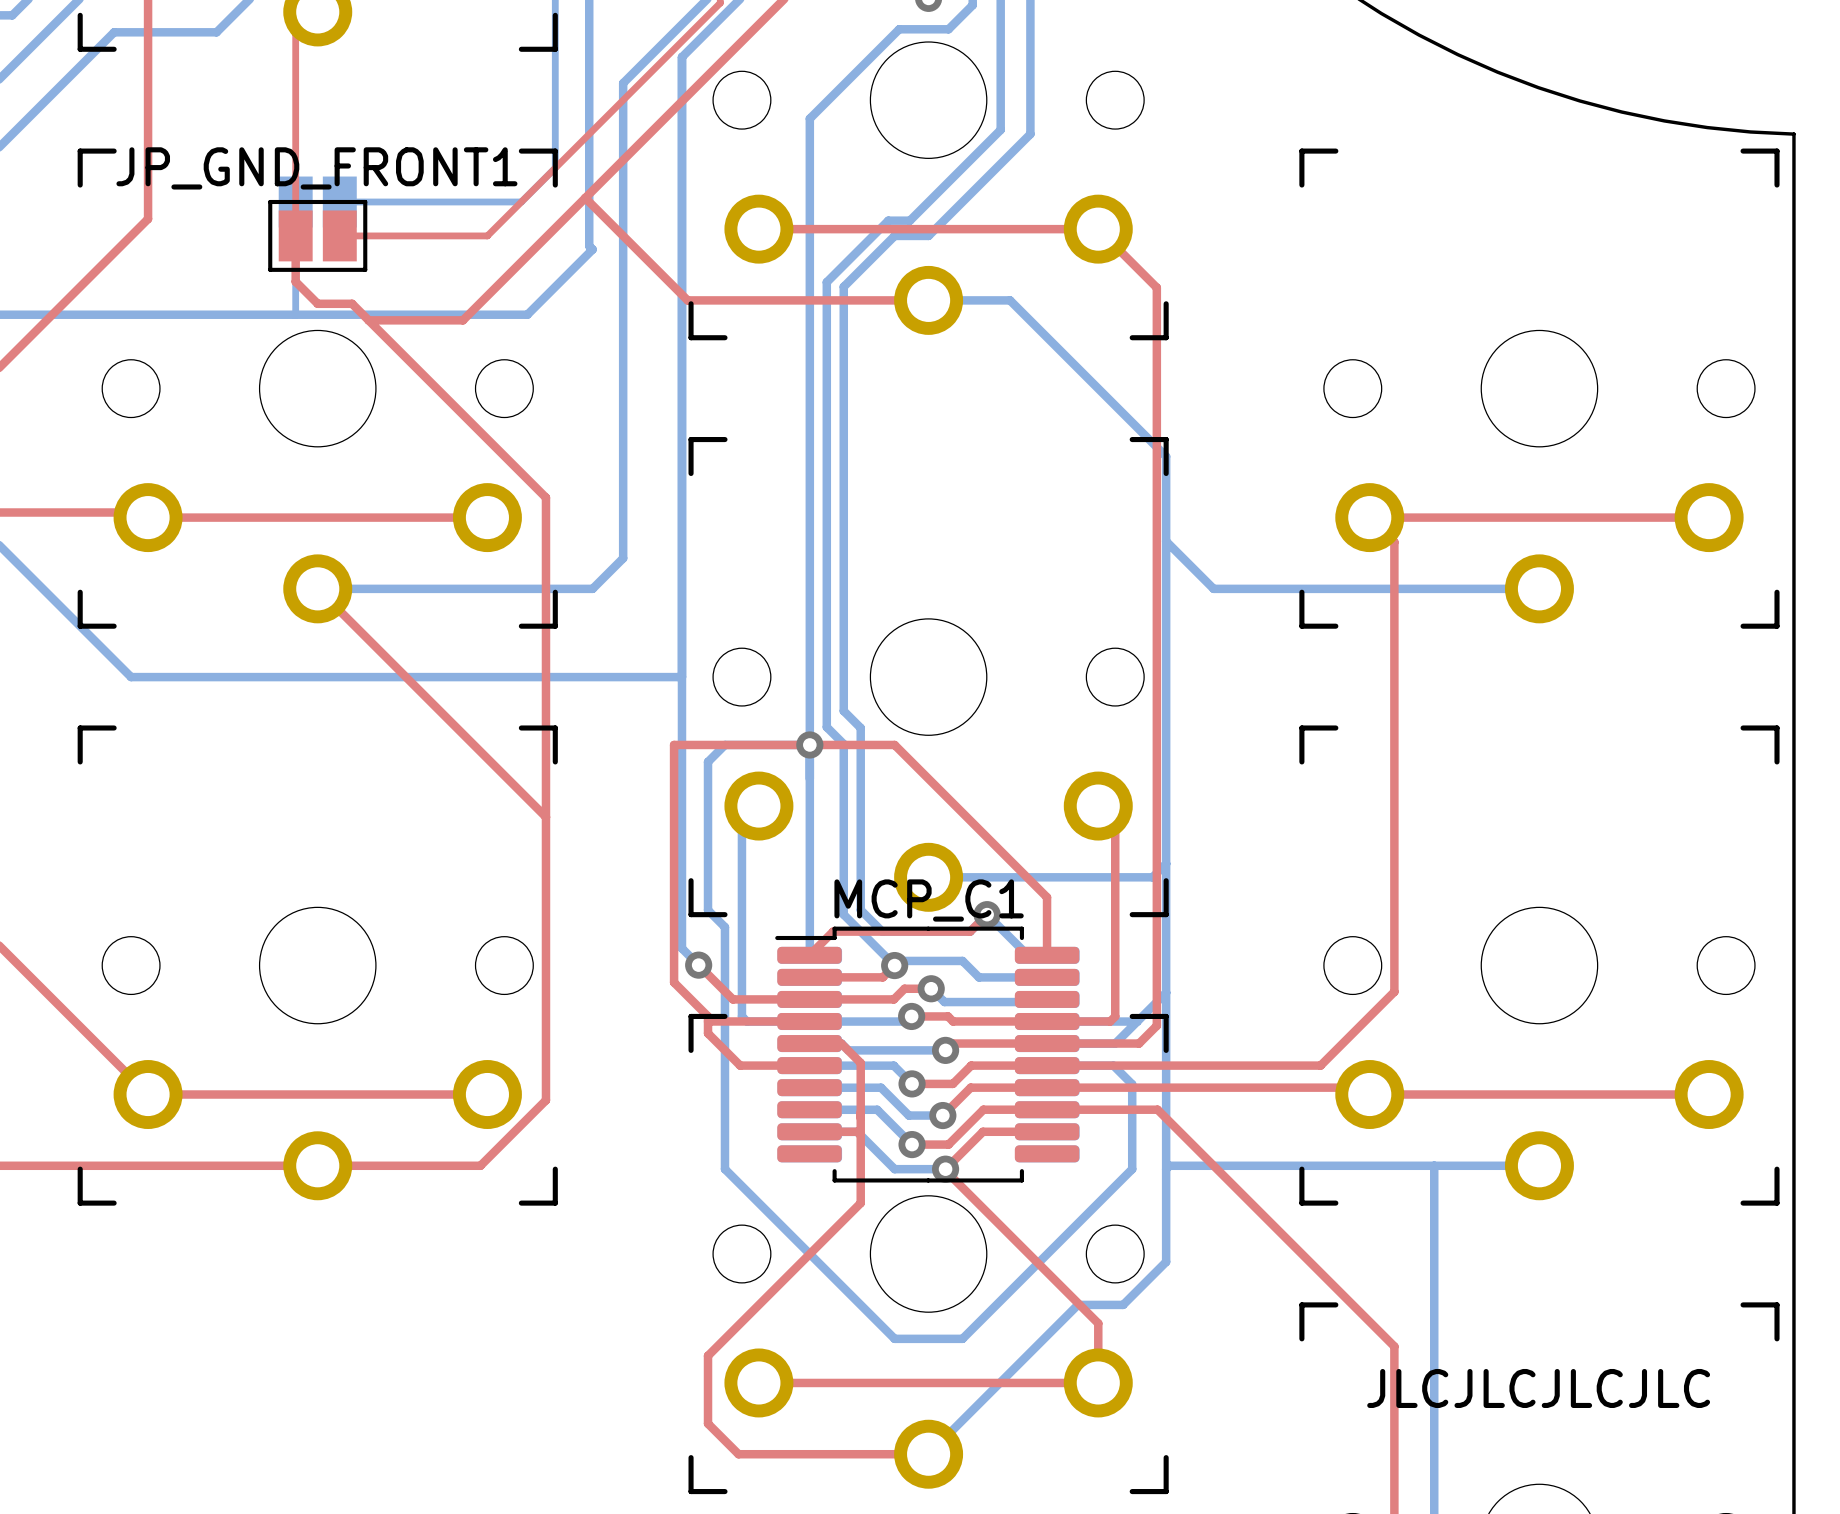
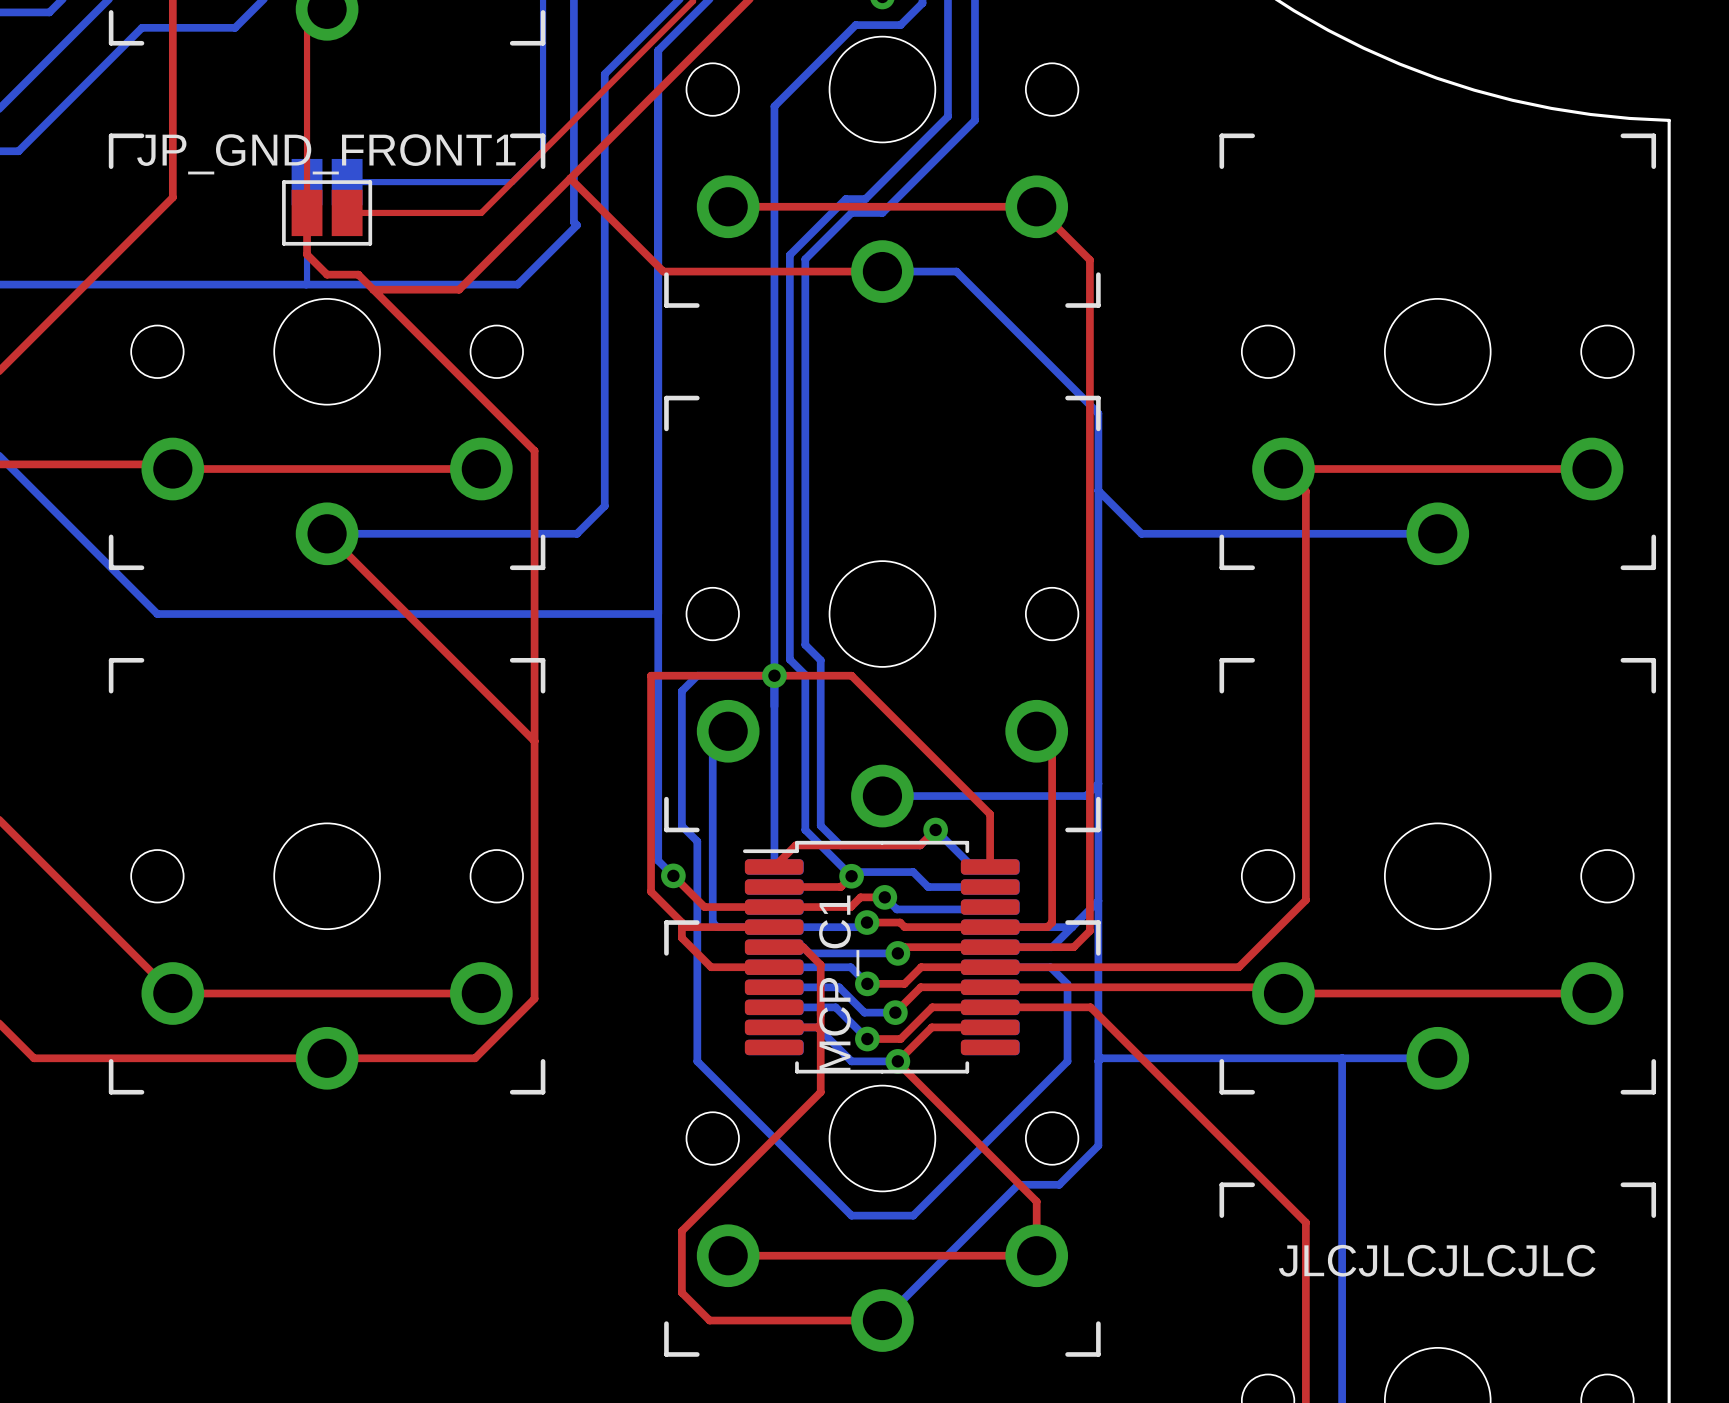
MCP_C1 name rotation: 0° (929, 900) -> 90° counterclockwise (839, 983)

